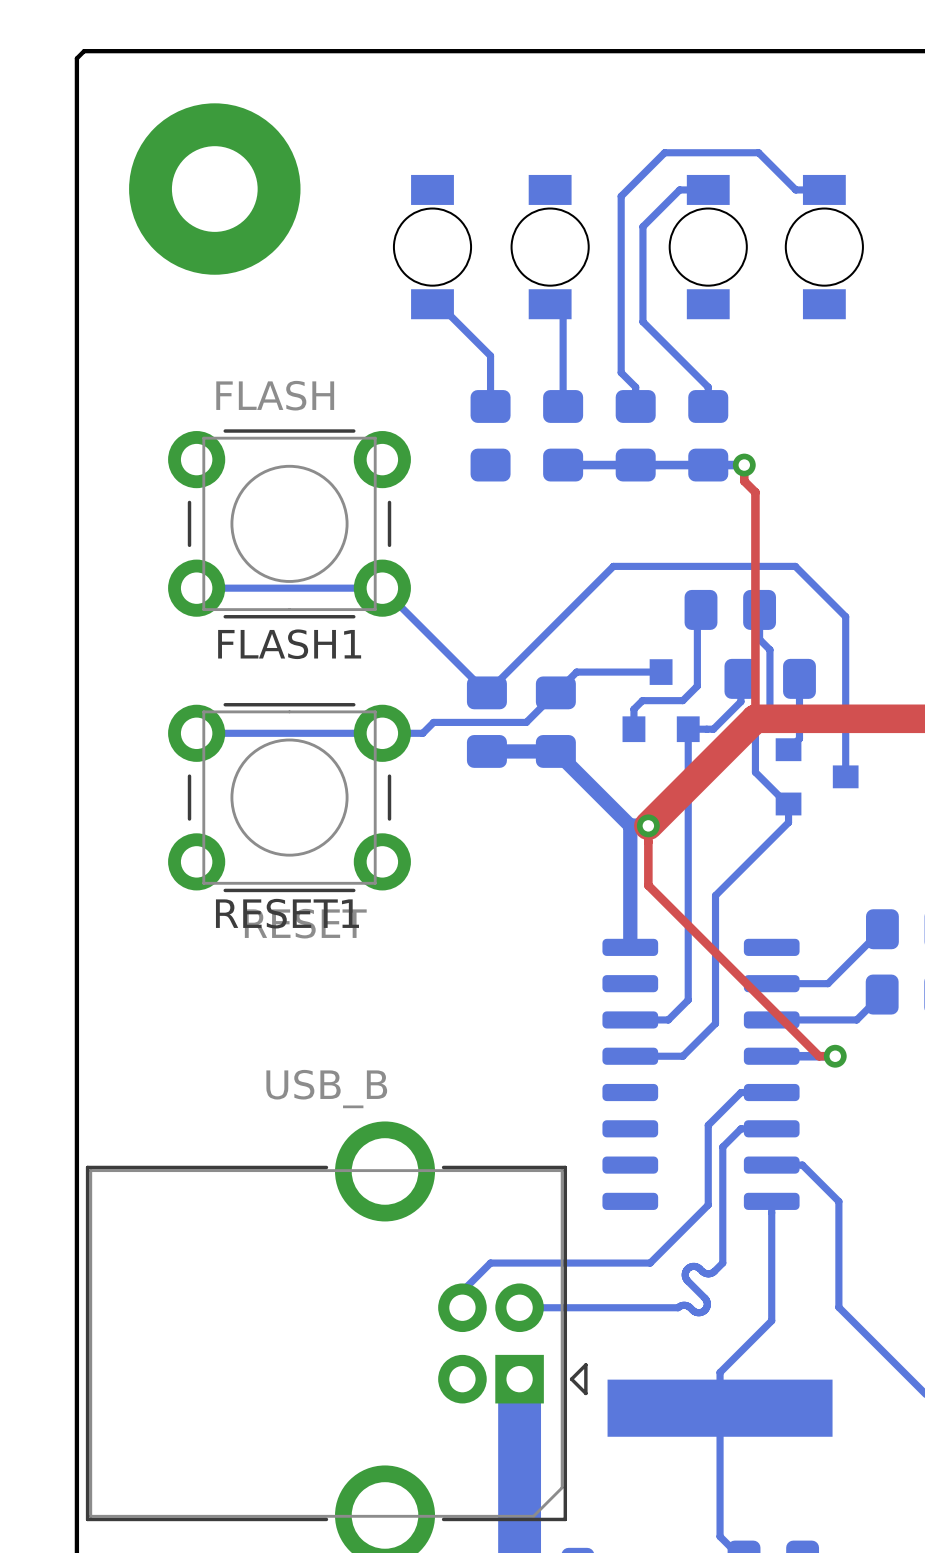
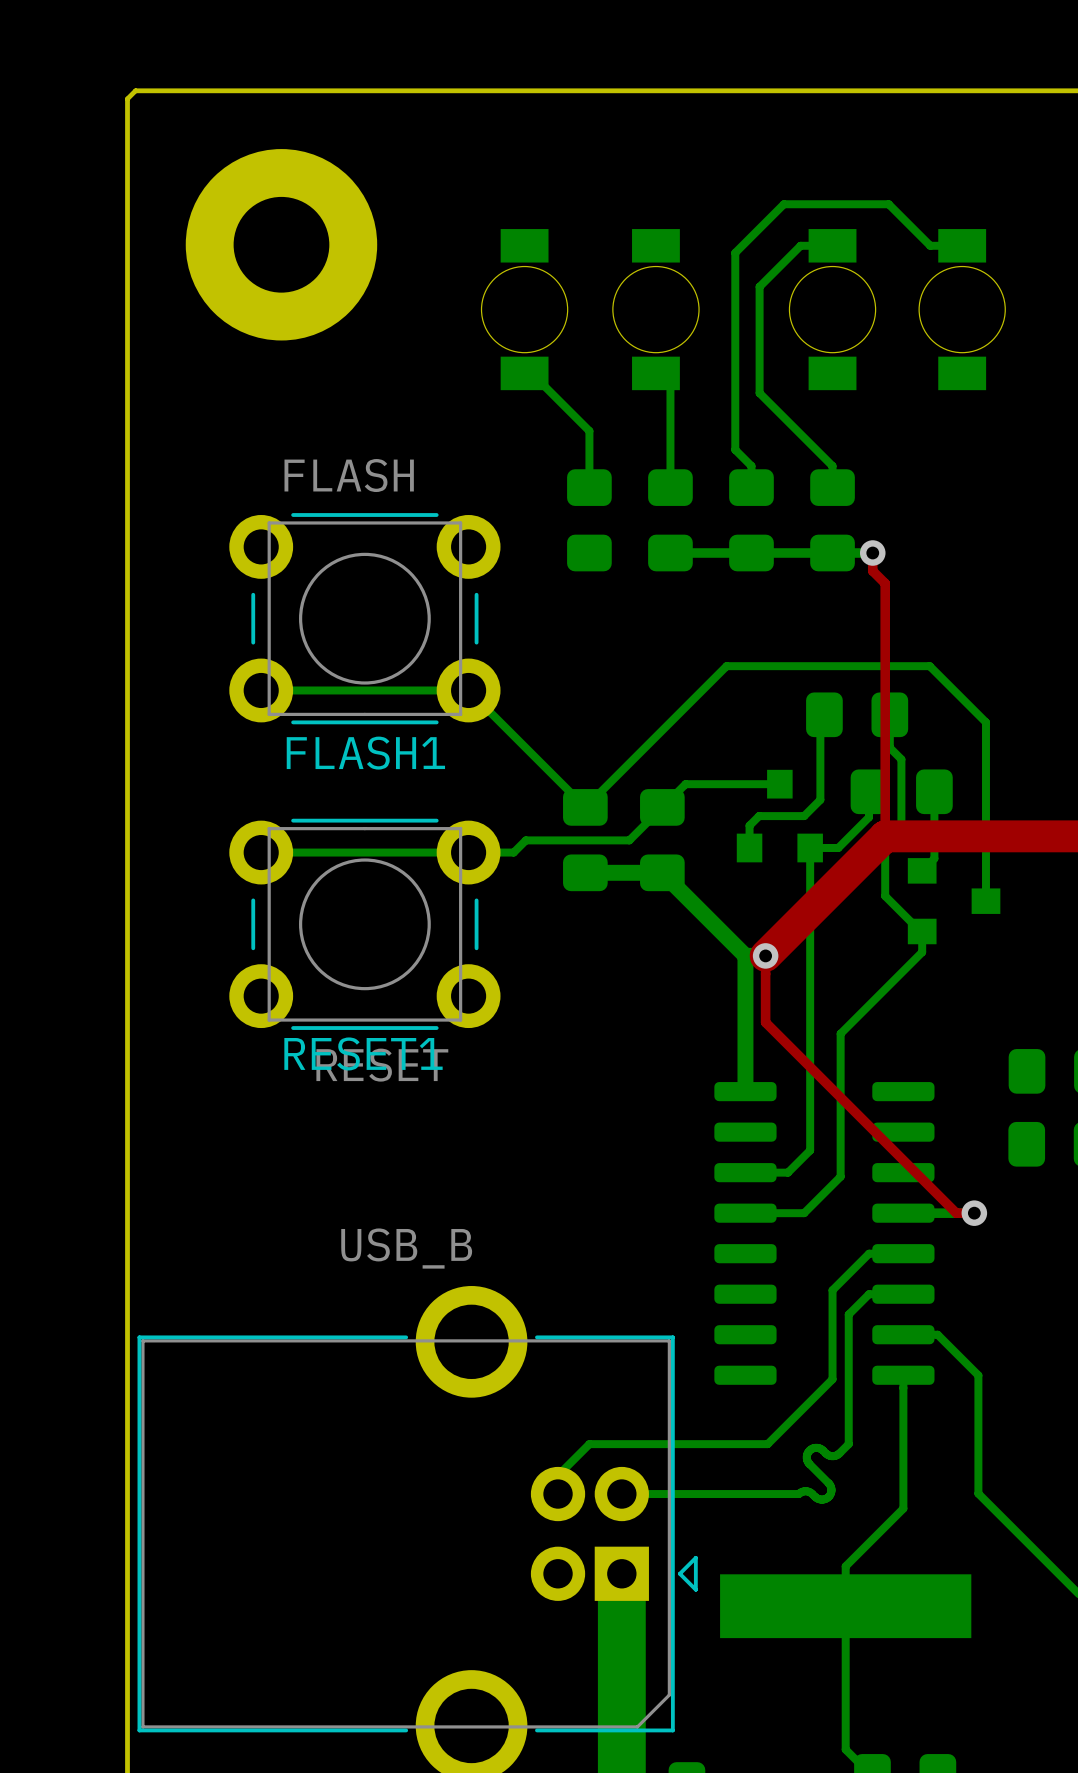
bottom track: (882, 929) (828, 983) (771, 983) -> none
bottom track: (882, 994) (856, 1019) (771, 1019) -> none

